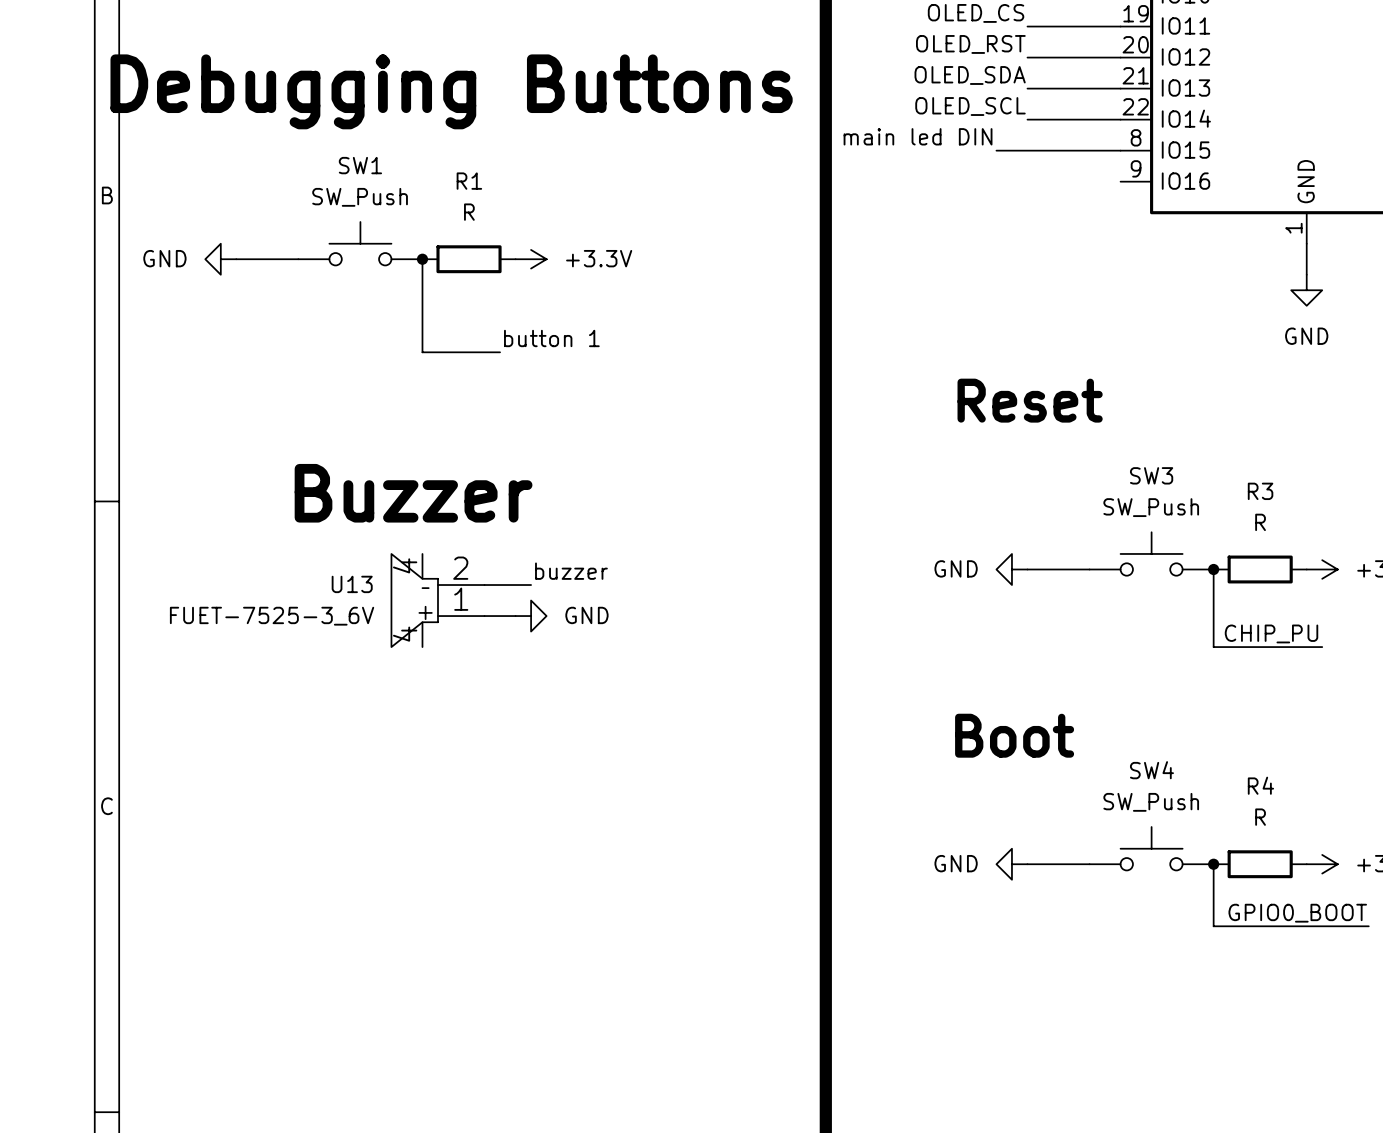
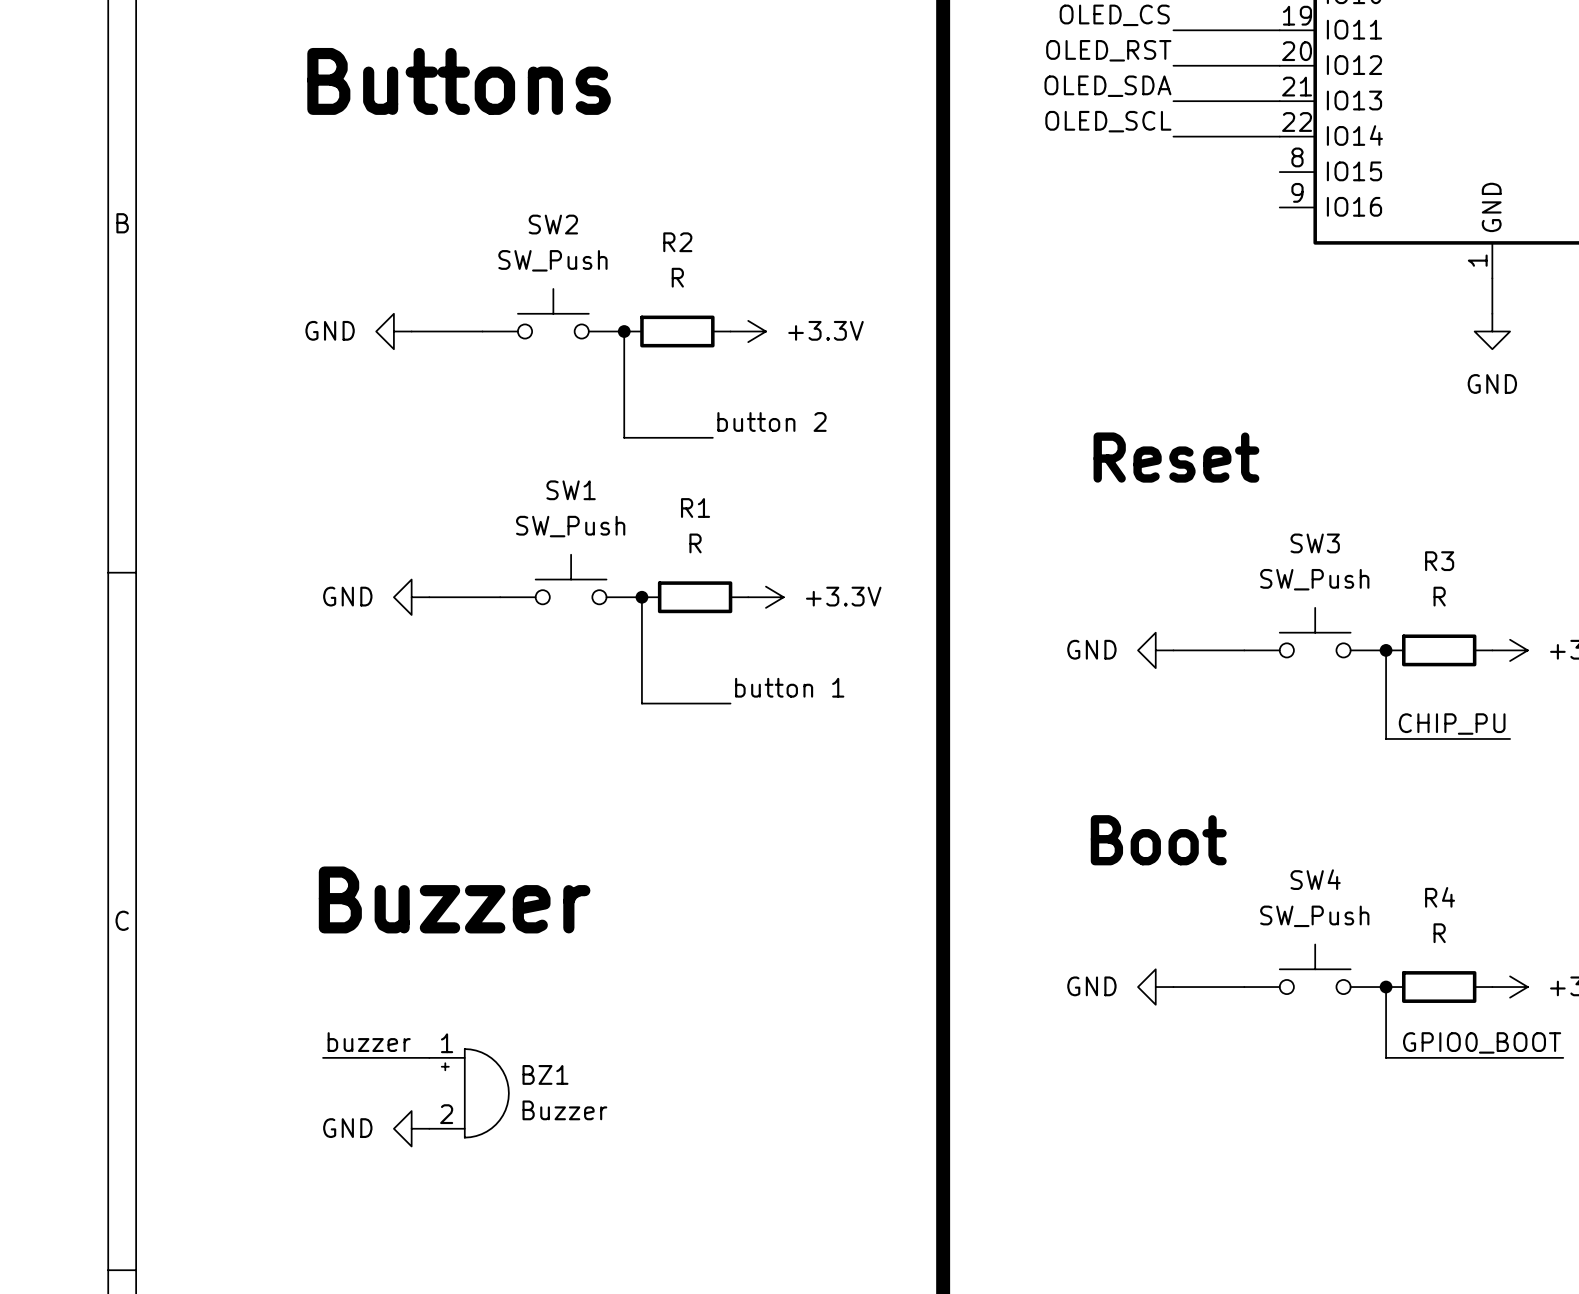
text: none -> Buttons (459, 81)
text: Debugging Buttons (451, 91) -> none
label: main led DIN (918, 136) -> none
wire: (996, 150) (1120, 150) -> none
SW1 position: (360, 243) -> (571, 579)
power symbol position: GND (220, 259) -> GND (393, 331)
wire: (236, 259) (298, 259) -> (411, 331) (482, 331)
wire: (422, 259) (422, 352) (500, 352) -> (624, 331) (624, 437) (712, 437)
junction: (422, 259) -> none
R1 position: (469, 259) -> (695, 597)
power symbol position: +3.3V (531, 259) -> +3.3V (748, 331)
SW2: none -> SW_Push (553, 313)
junction: none -> (624, 331)
R2: none -> R (677, 331)
label position: button 1 (551, 338) -> button 1 (789, 687)
label: none -> button 2 (772, 421)
text position: Buzzer (413, 493) -> Buzzer (454, 899)
power symbol: none -> GND (411, 597)
wire: none -> (429, 597) (500, 597)
wire: none -> (641, 597) (641, 703) (730, 703)
junction: none -> (641, 597)
power symbol: none -> +3.3V (765, 597)
label: buzzer (571, 571) -> none
wire: (484, 585) (531, 585) -> none
U13: FUET-7525-3_6V (437, 600) -> none
wire: (484, 616) (515, 616) -> none
power symbol: GND (531, 616) -> none
label: none -> buzzer (369, 1042)
wire: none -> (323, 1057) (429, 1057)
BZ1: none -> Buzzer (469, 1093)
power symbol: none -> GND (411, 1128)

